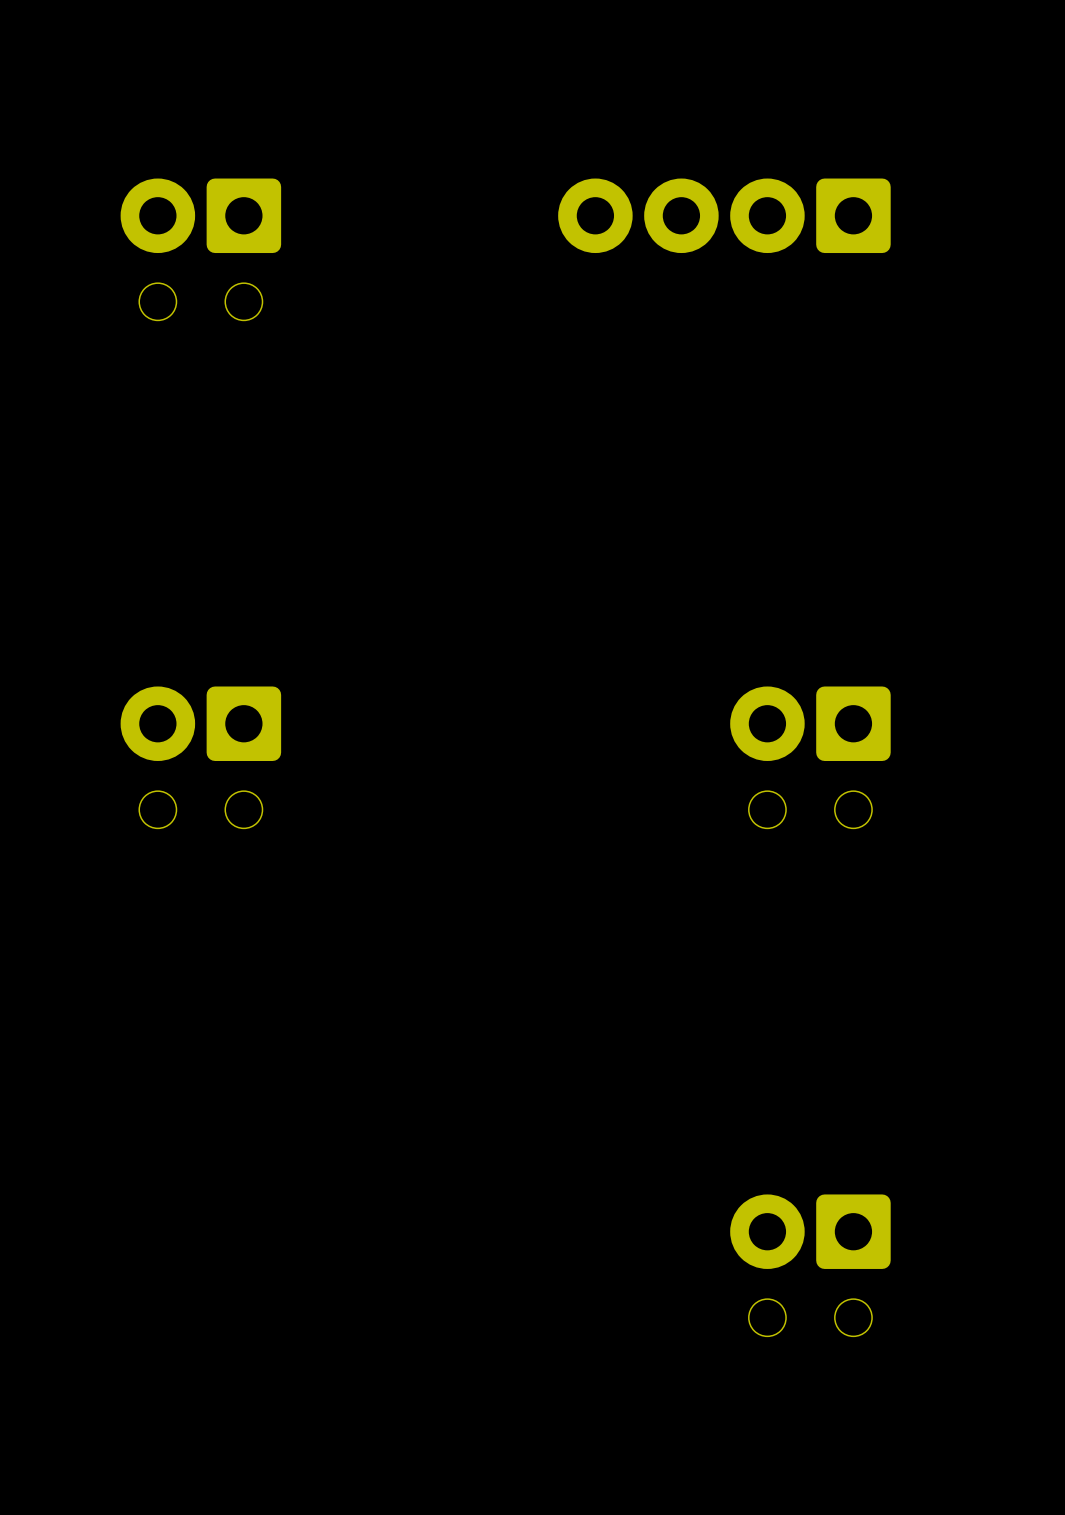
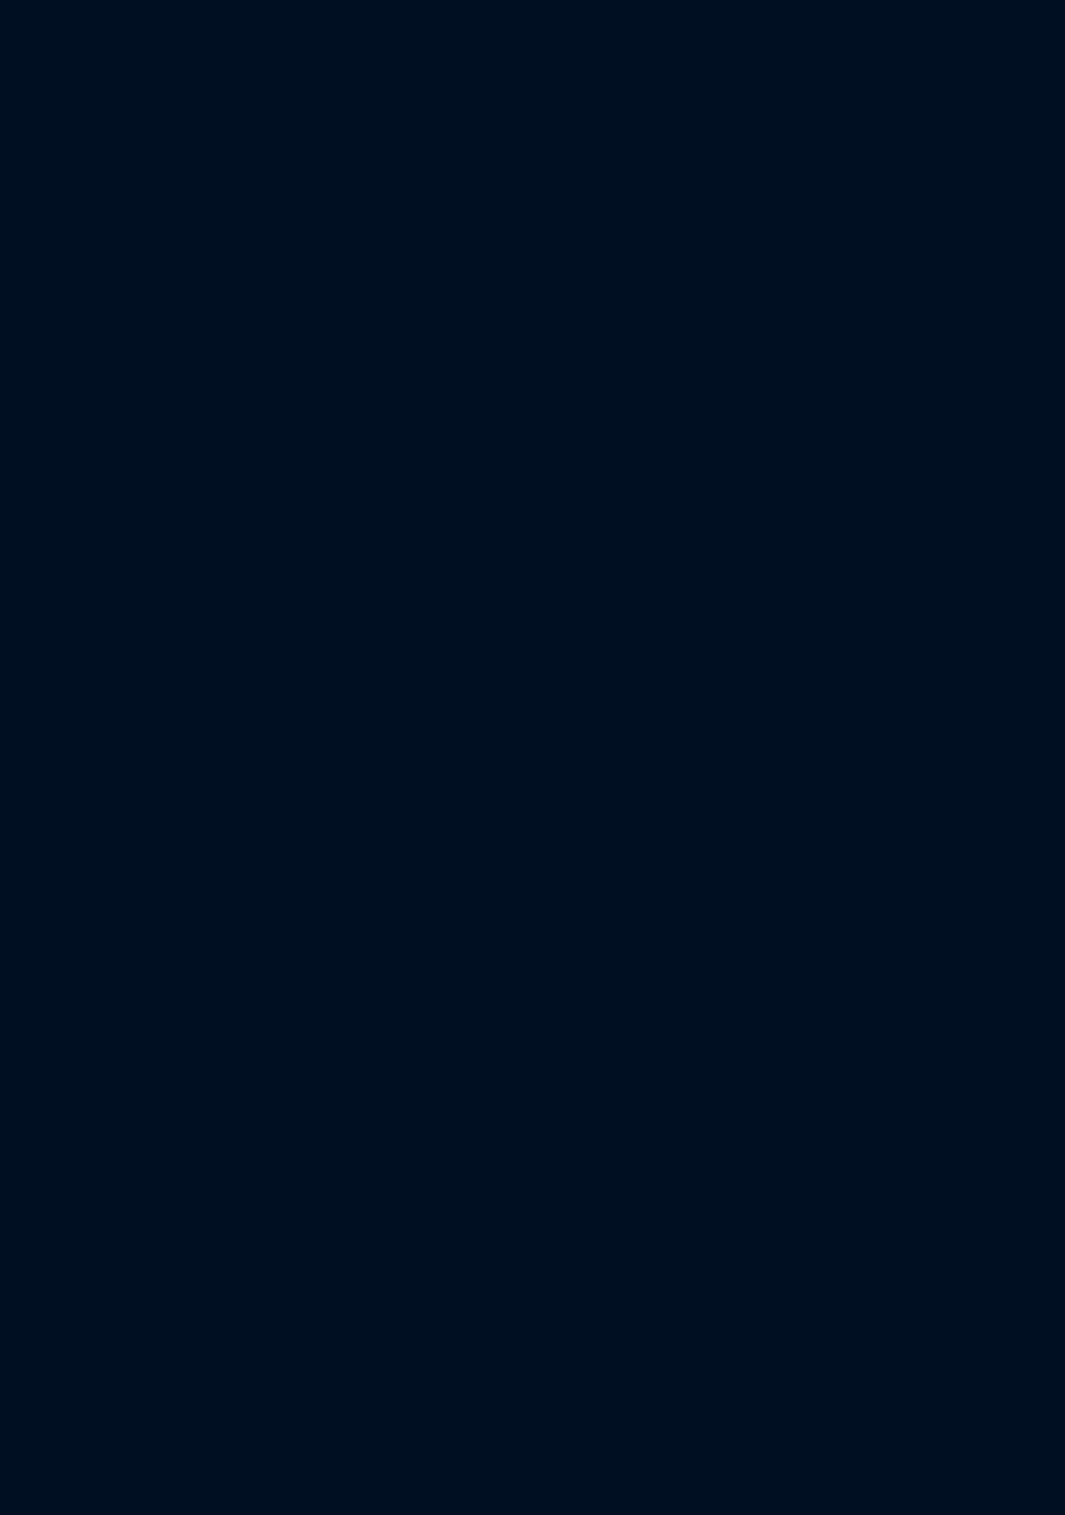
part: (724, 215) -> none
part: (200, 249) -> none
part: (200, 757) -> none
part: (810, 757) -> none
part: (810, 1265) -> none

